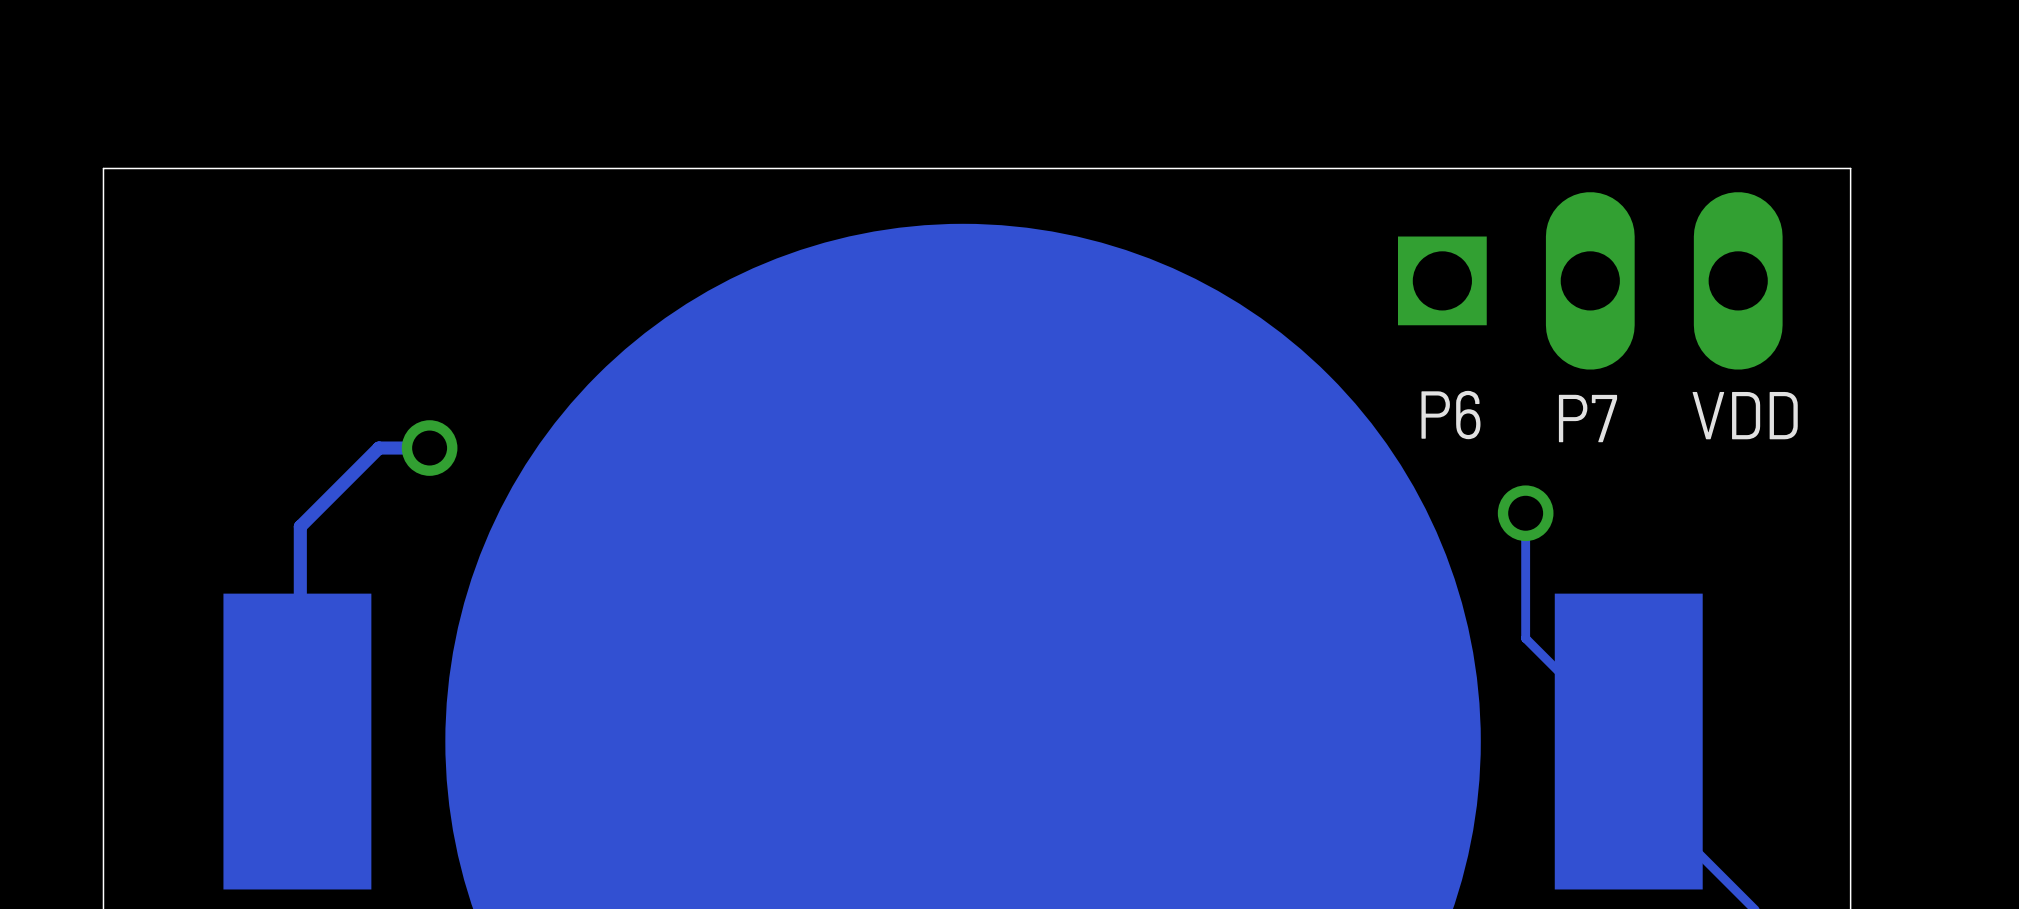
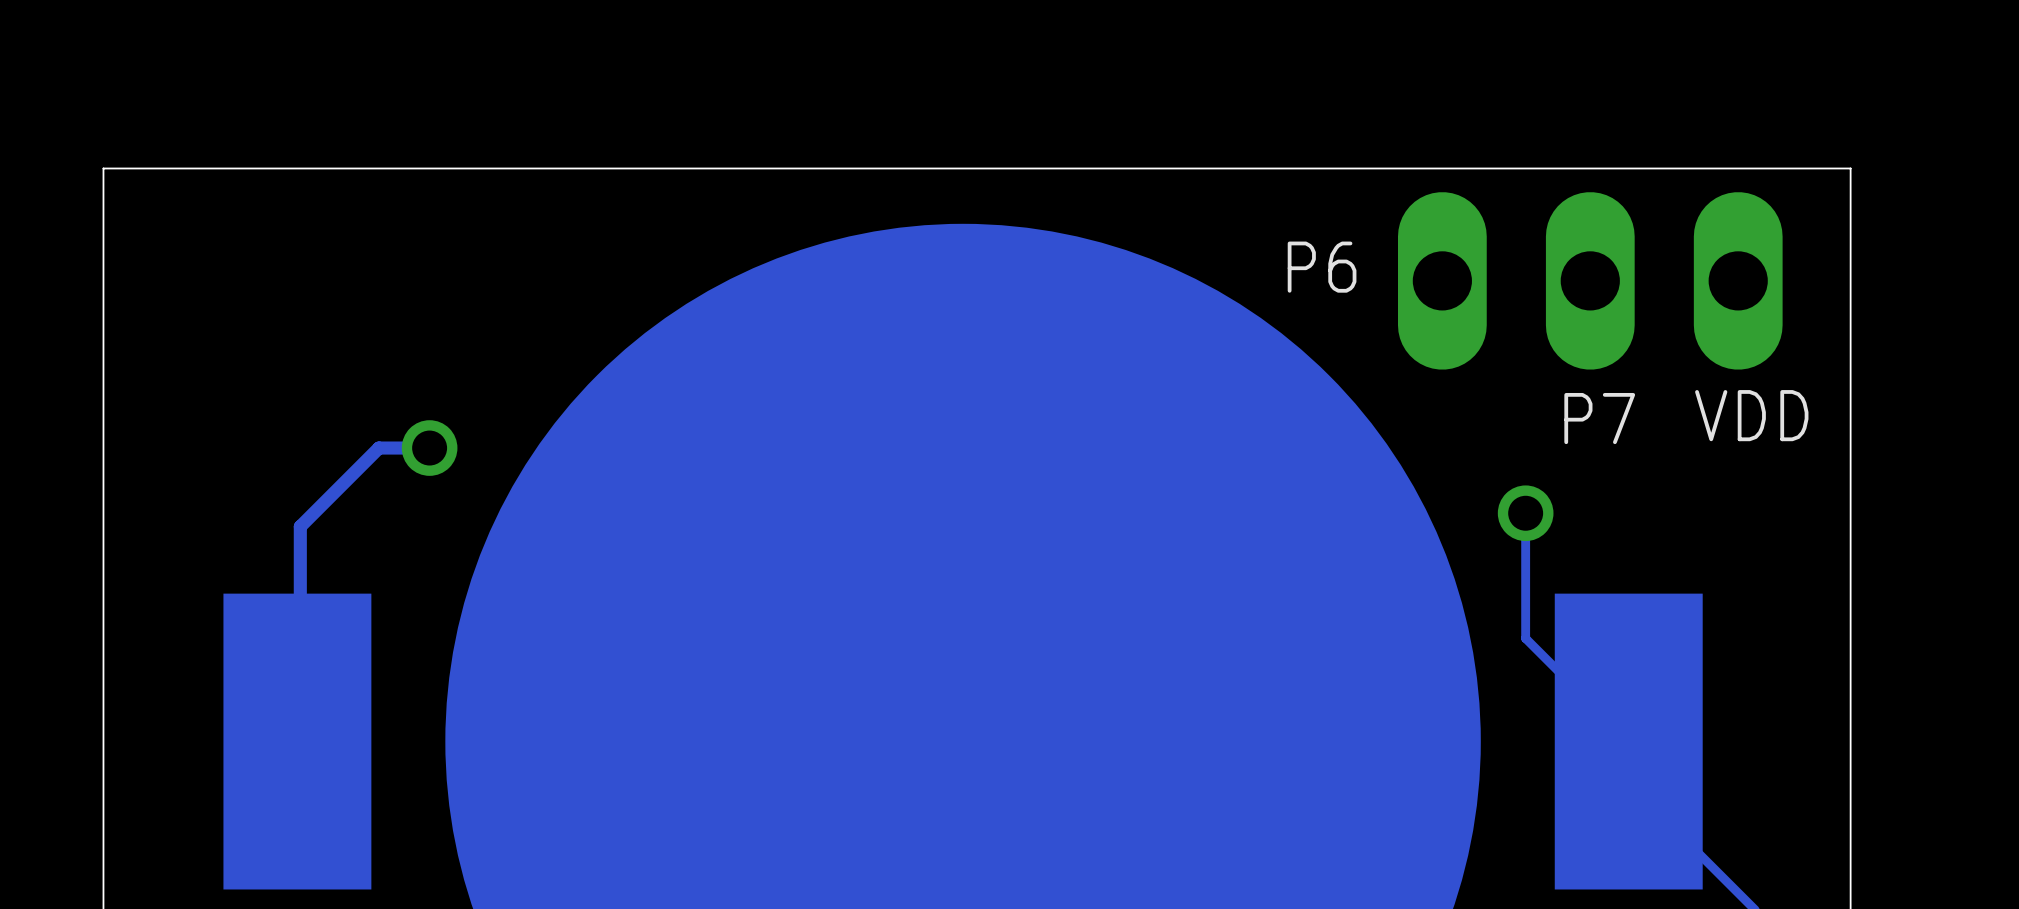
part footprint: [1397, 192, 1783, 370] -> [1397, 192, 1783, 370]
text position: P6 (1450, 415) -> P6 (1322, 267)

